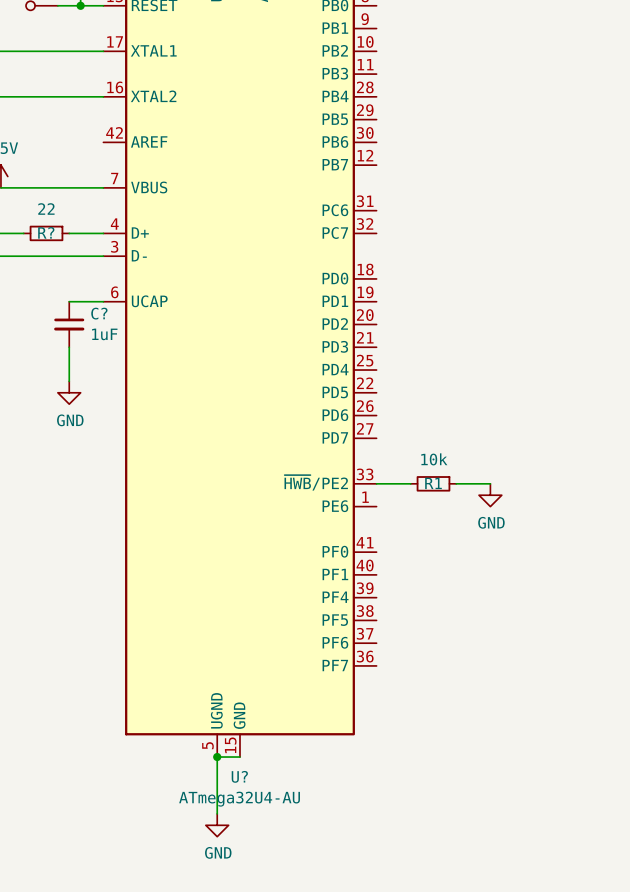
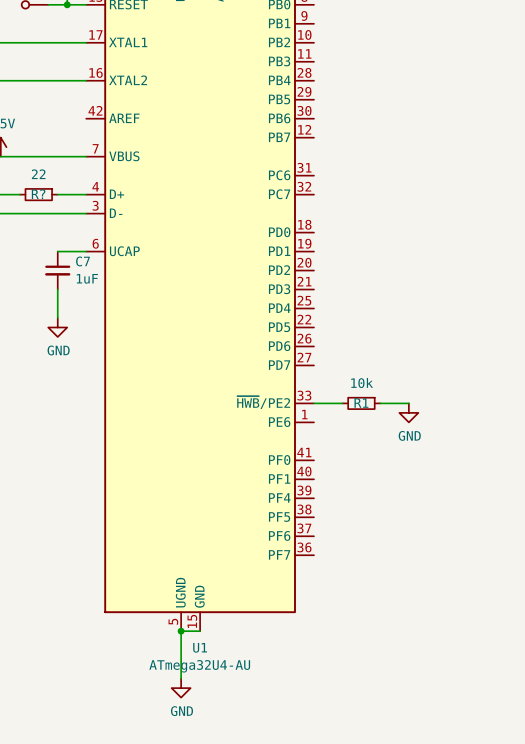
C? name: C? (99, 313) -> C7 (82, 261)
U? name: U? (239, 776) -> U1 (200, 647)

